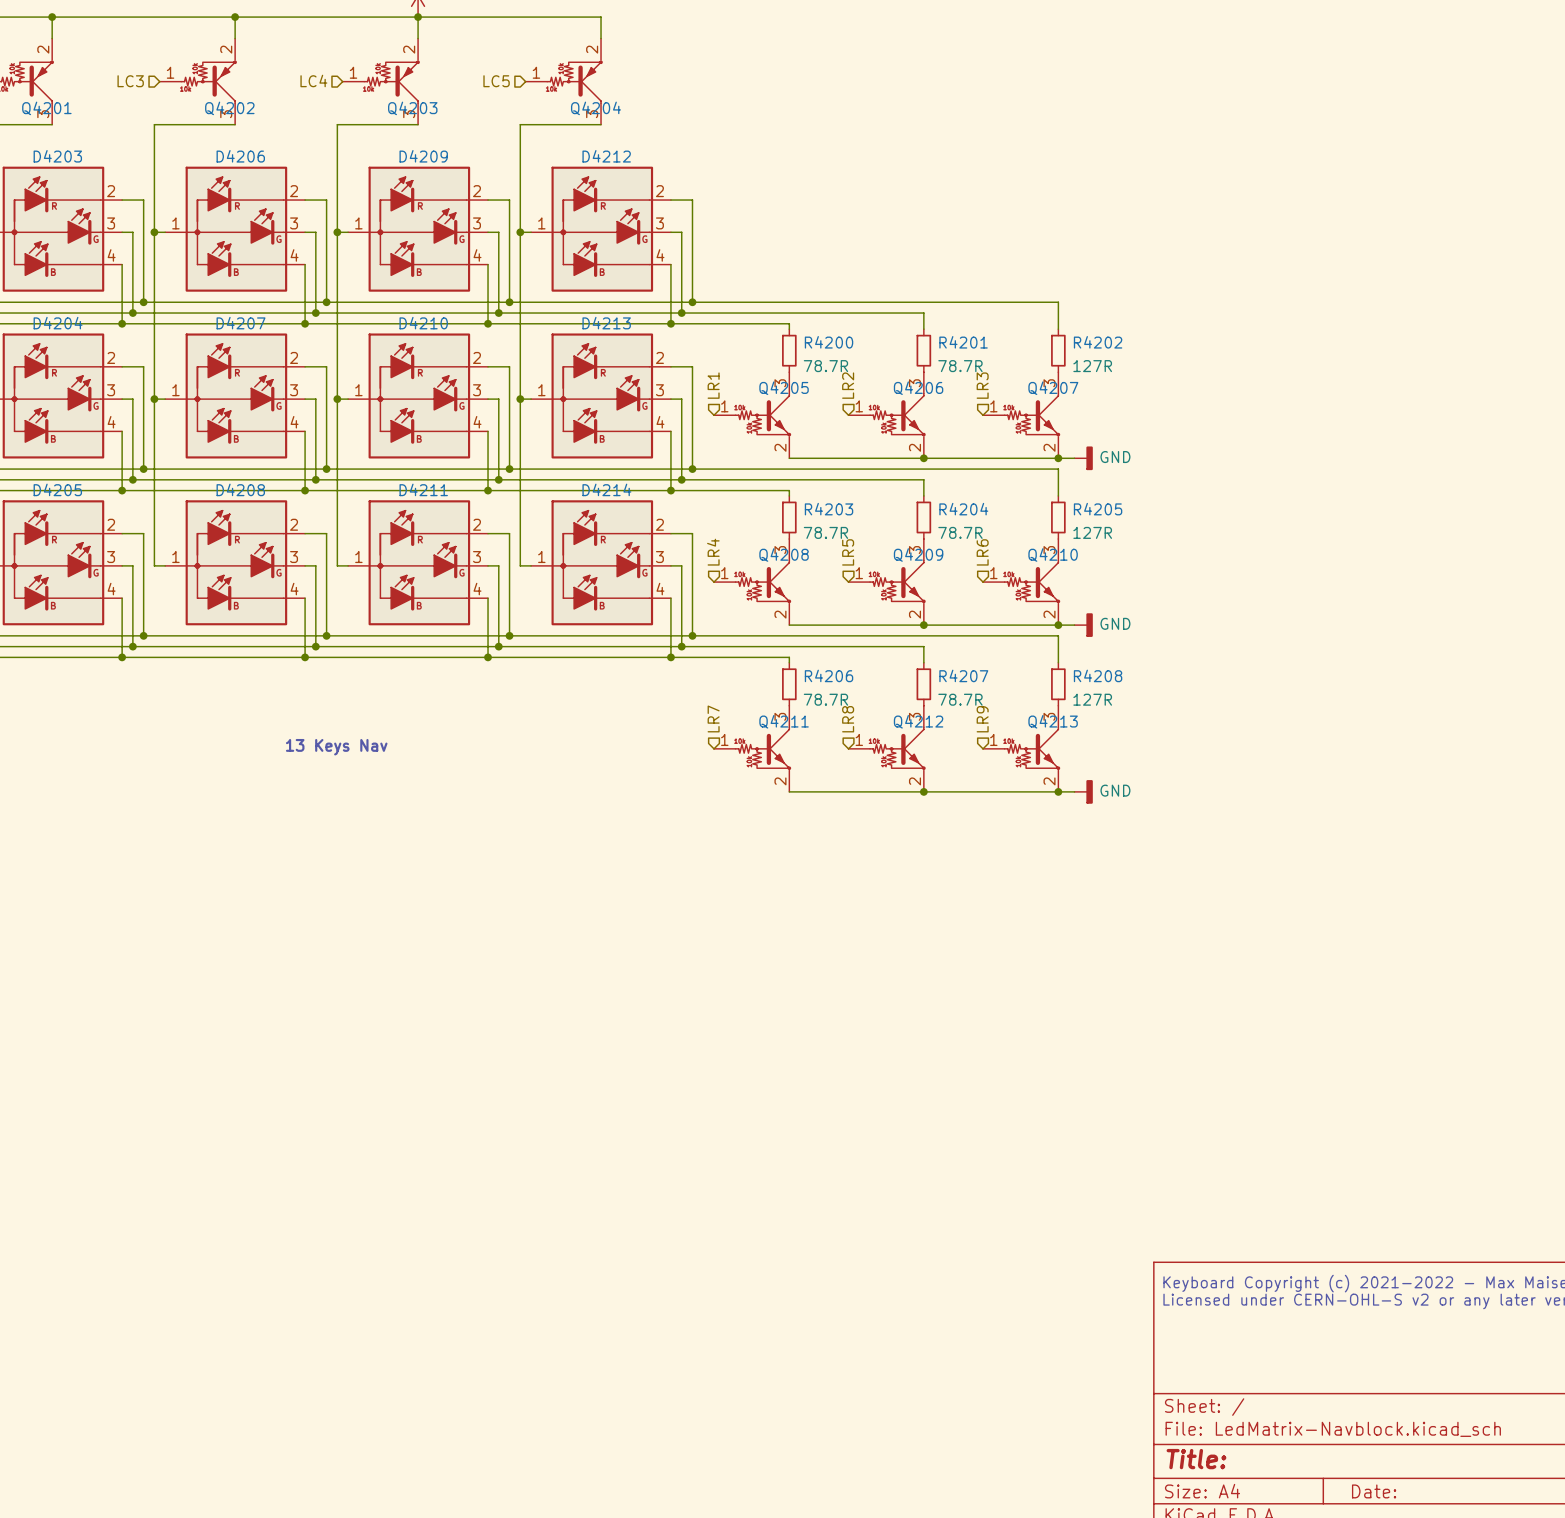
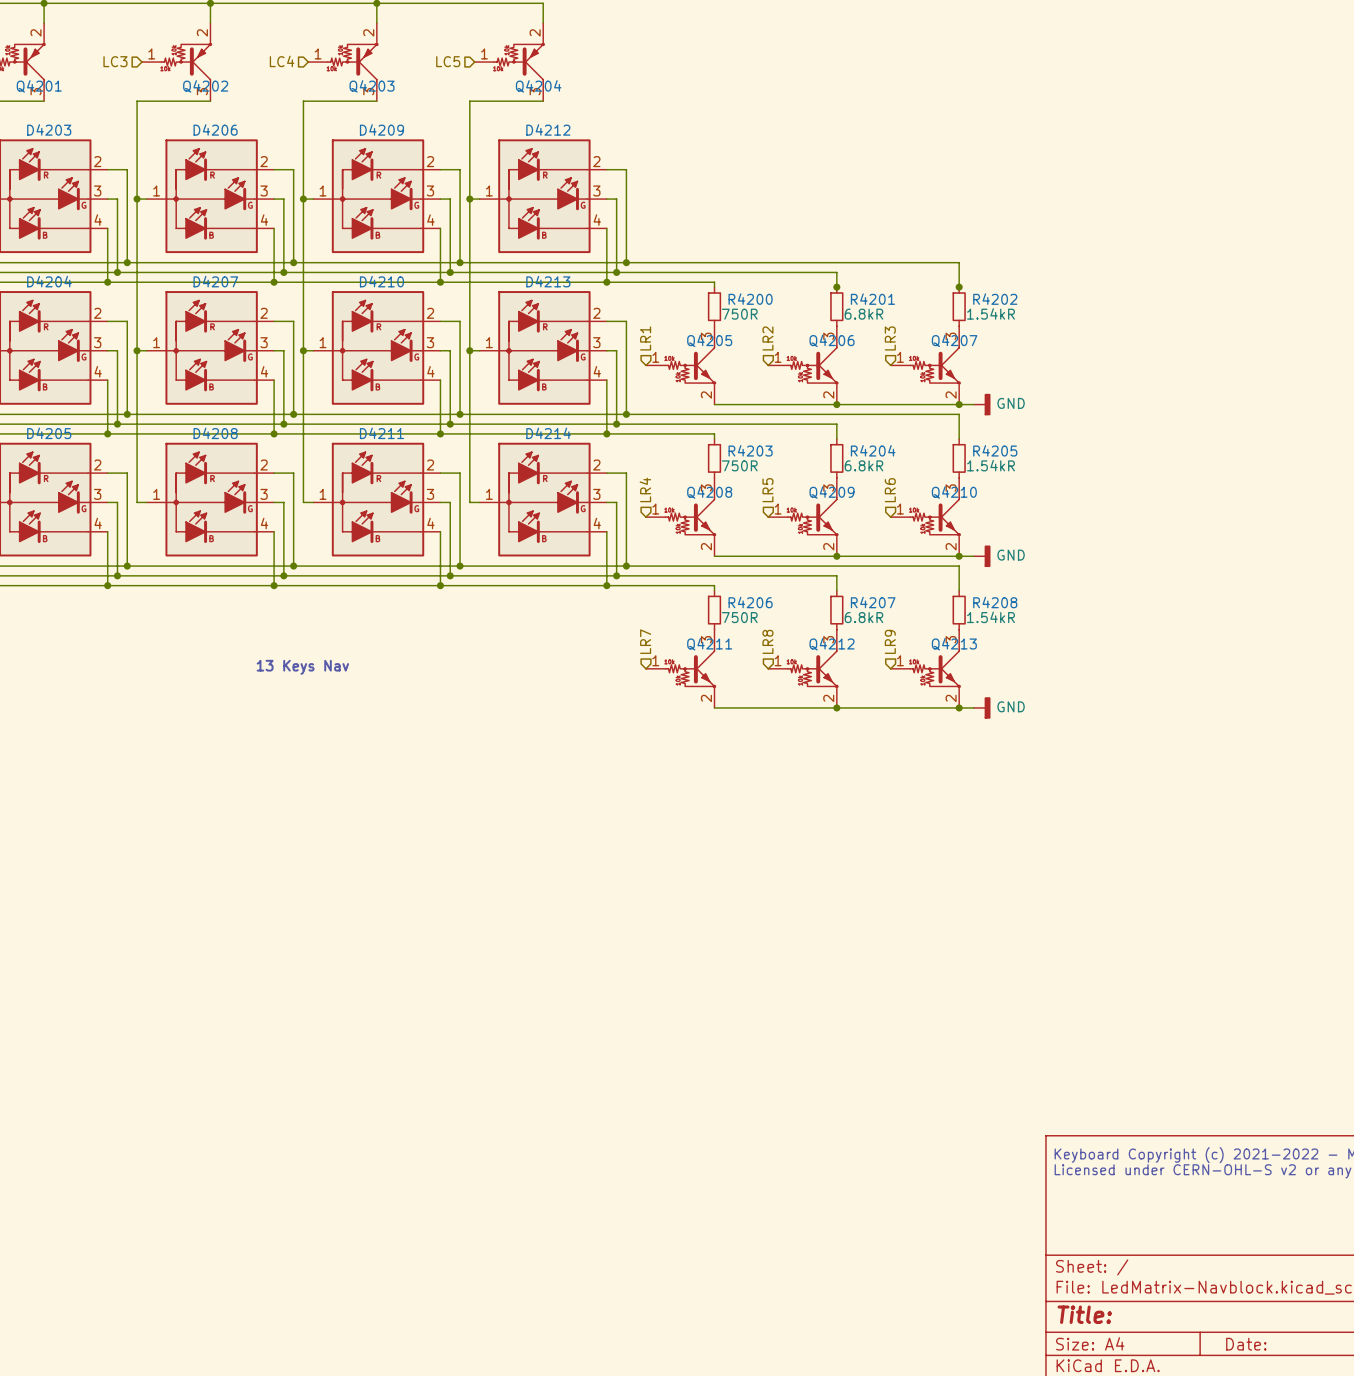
junction: none -> (836, 287)
junction: none -> (959, 287)
R4200 value: 78.7R (825, 366) -> 750R (739, 314)
R4201 value: 78.7R (960, 366) -> 6.8kR (863, 314)
R4202 value: 127R (1092, 366) -> 1.54kR (990, 313)
R4203 value: 78.7R (825, 532) -> 750R (739, 465)
R4204 value: 78.7R (960, 532) -> 6.8kR (863, 465)
R4205 value: 127R (1092, 532) -> 1.54kR (990, 465)
R4206 value: 78.7R (825, 699) -> 750R (739, 617)
R4207 value: 78.7R (960, 699) -> 6.8kR (863, 617)
R4208 value: 127R (1092, 699) -> 1.54kR (990, 617)

